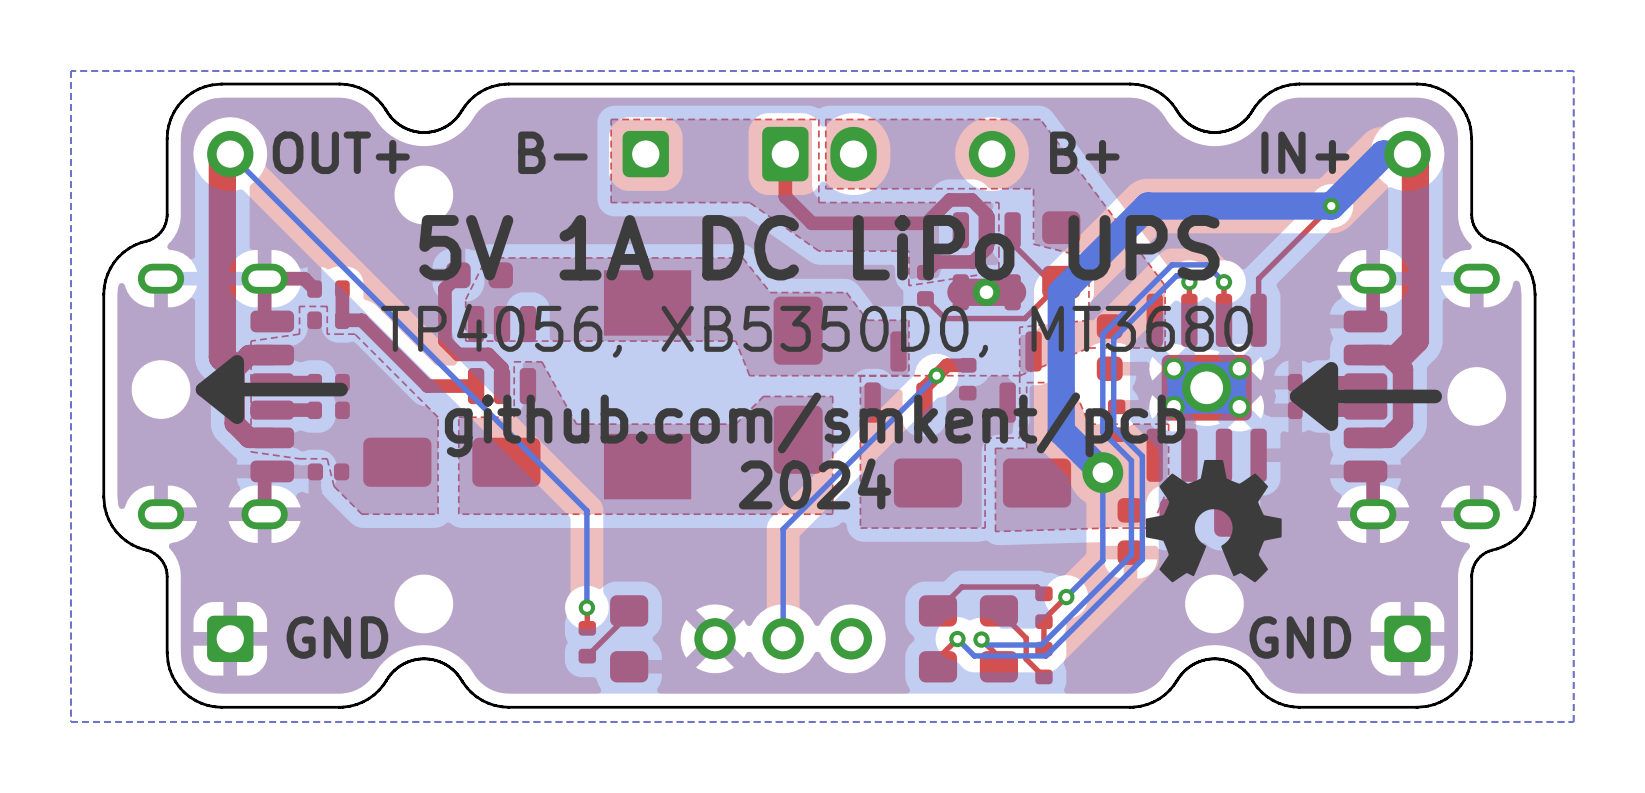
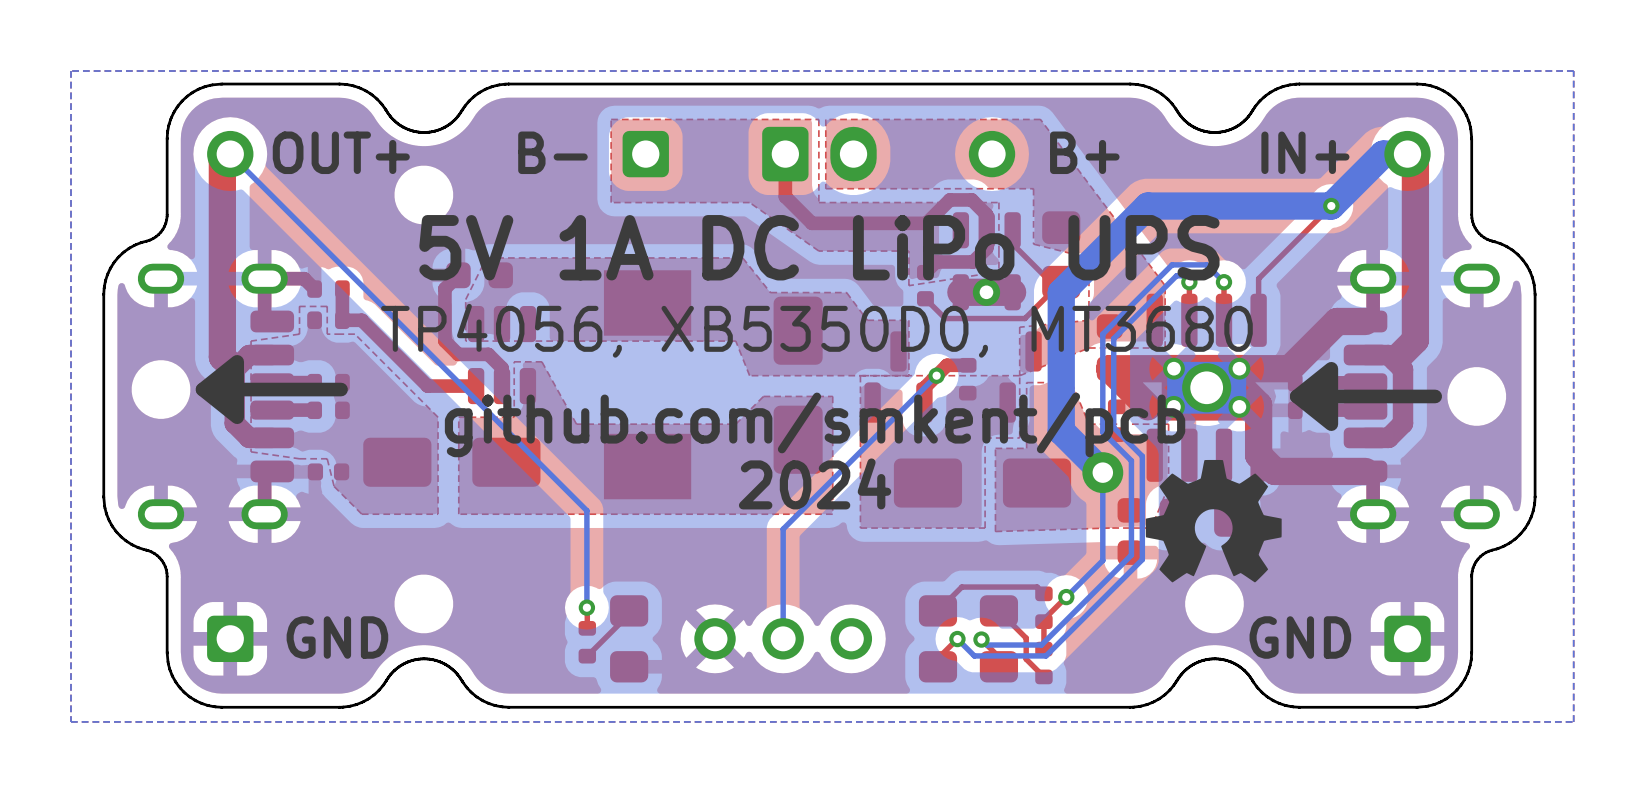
top track: none -> (1365, 321) (1337, 321) (1289, 368) (1225, 368) (1206, 387) (1241, 387) (1258, 405) (1258, 455) (1274, 471) (1365, 471)
top track: none -> (1173, 368) (1109, 368) (1147, 406)

